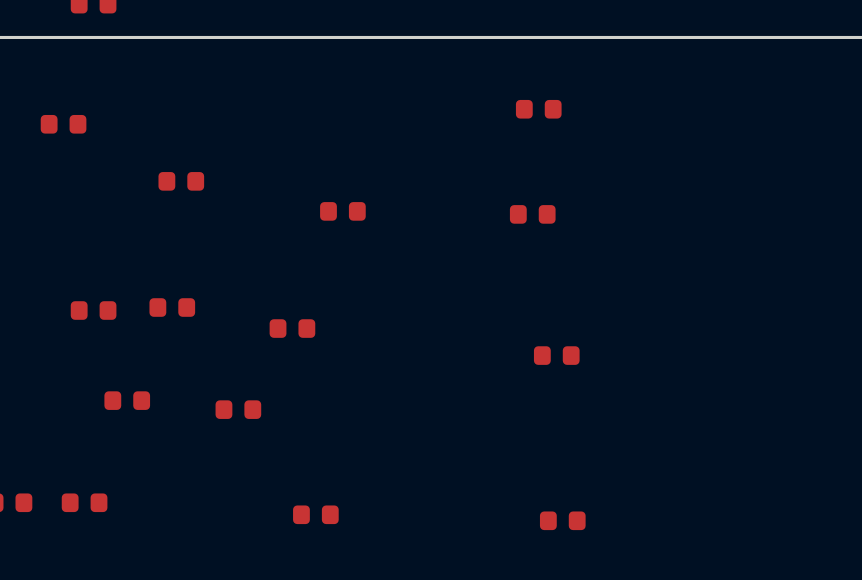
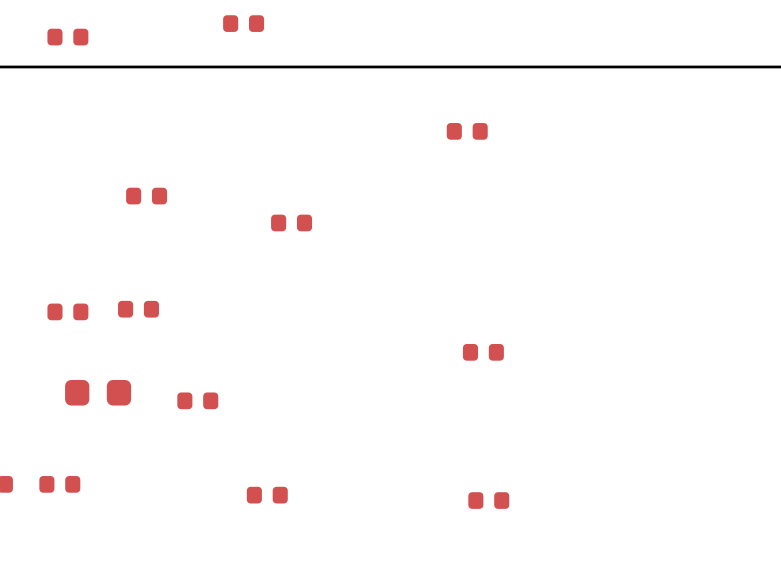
part: (63, 124) -> none
part: (532, 214) -> none
part: (292, 328) -> none
part footprint: [104, 391, 151, 410] -> [65, 379, 132, 406]

